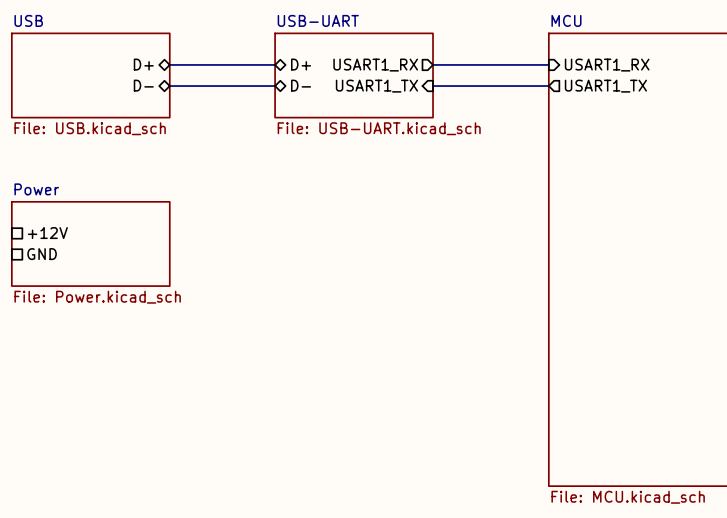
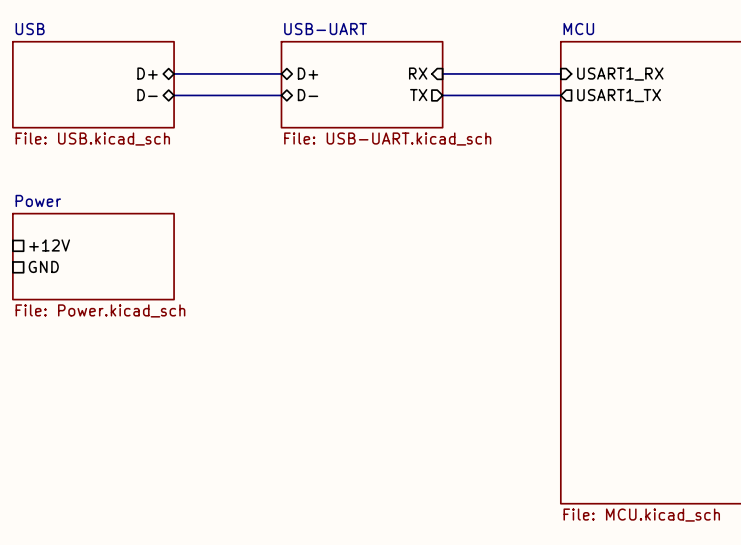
sheet pin shape: output (375, 65) -> input (418, 73)
sheet pin: USART1_RX (375, 65) -> RX (418, 73)
sheet pin shape: input (376, 86) -> output (418, 95)
sheet pin: USART1_TX (376, 86) -> TX (418, 95)

